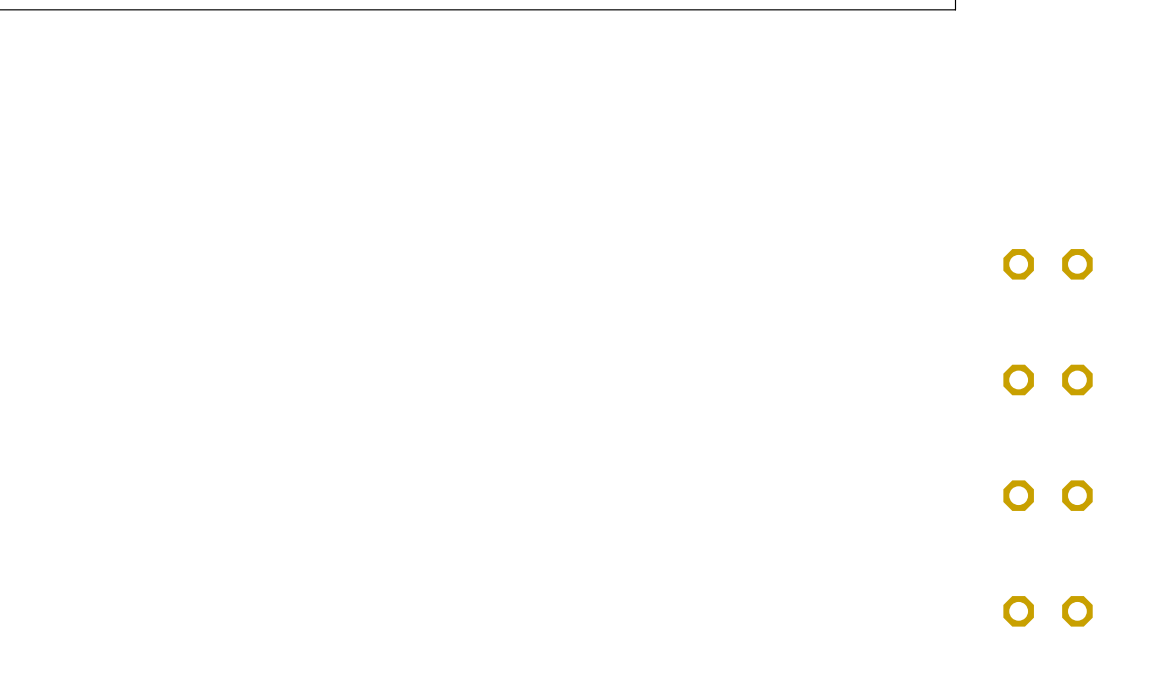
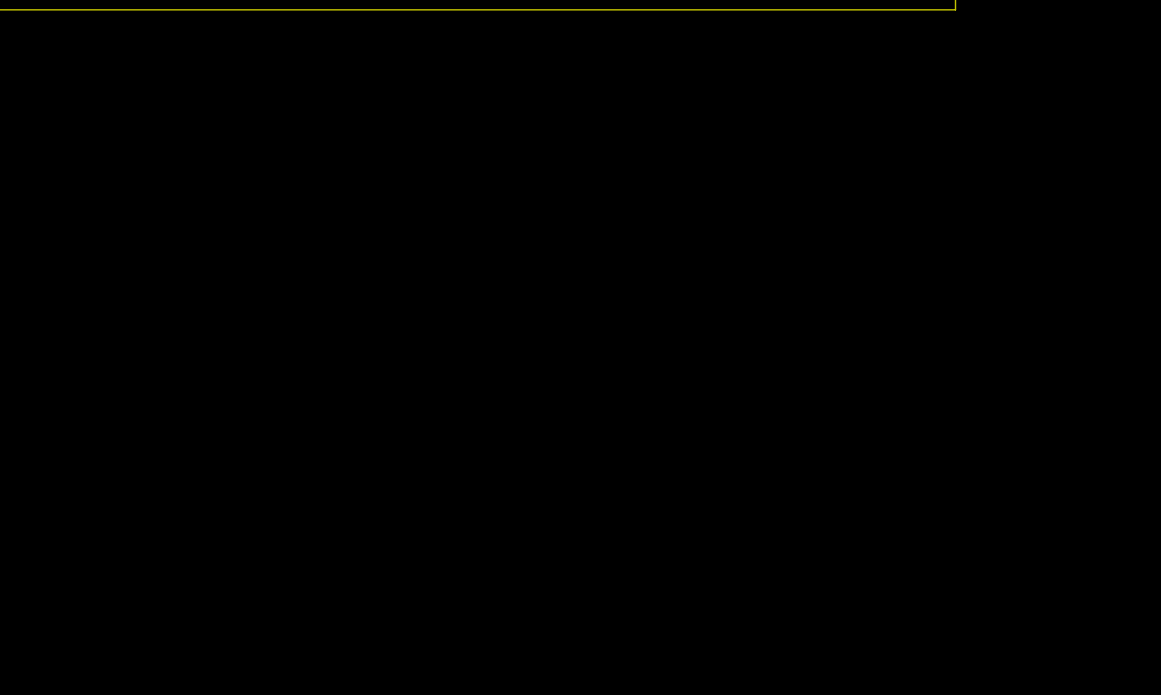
part: (1048, 264) -> none
part: (1048, 379) -> none
part: (1048, 495) -> none
part: (1048, 611) -> none

